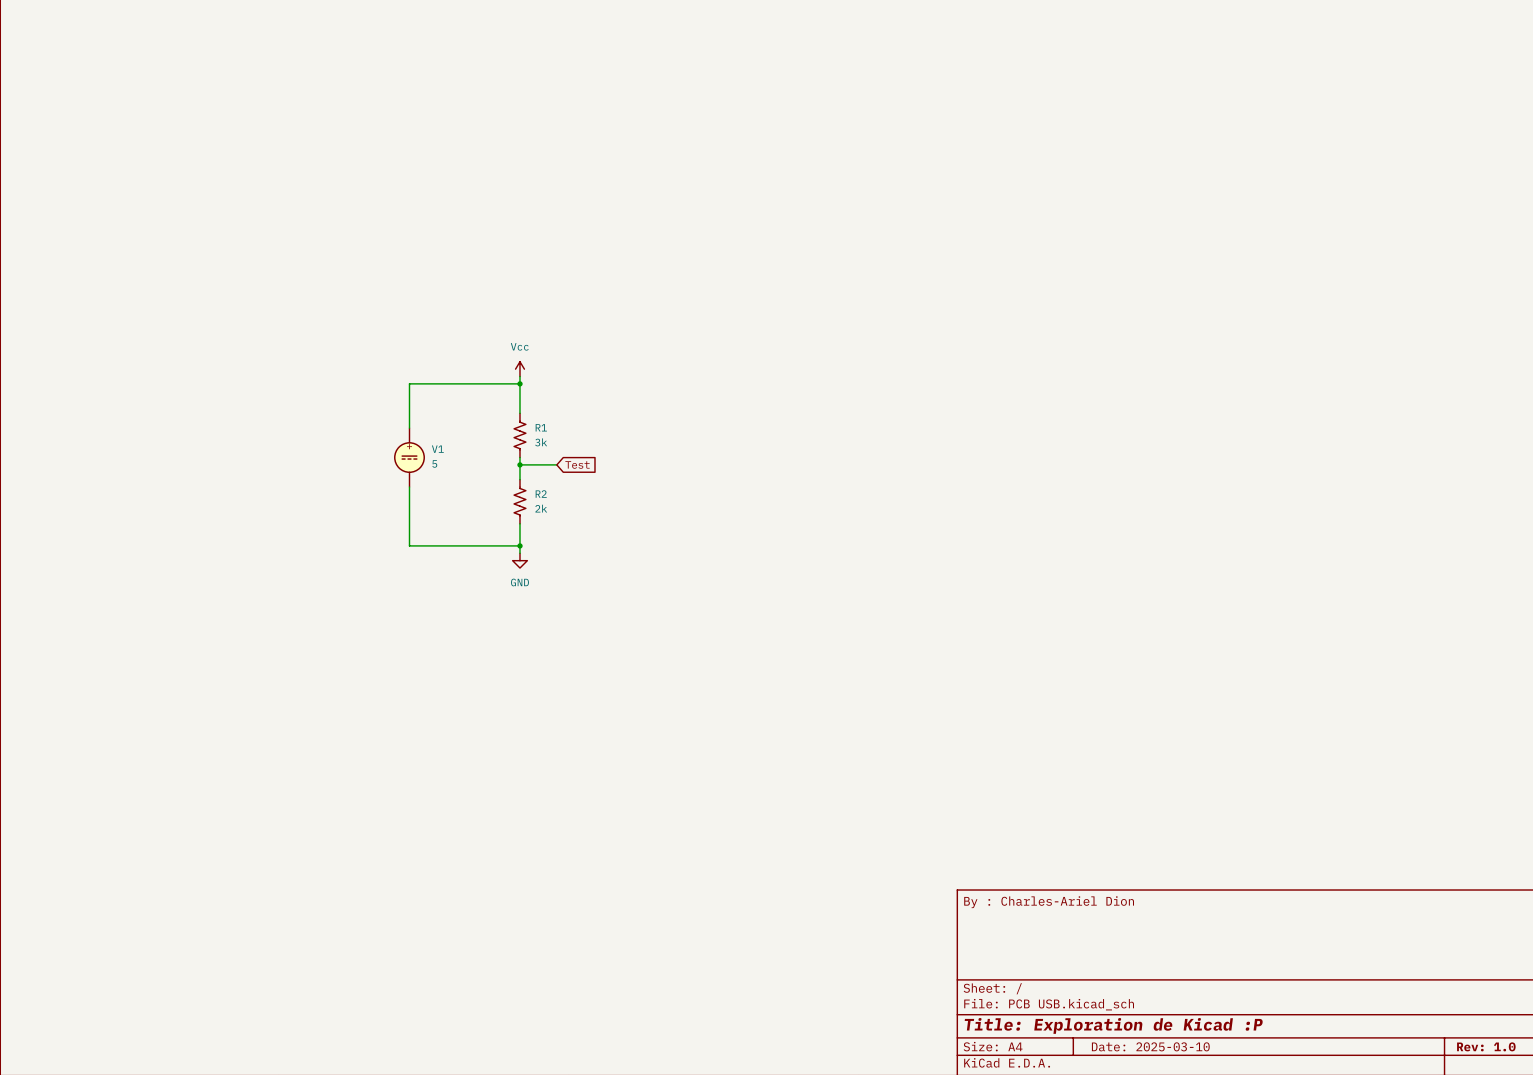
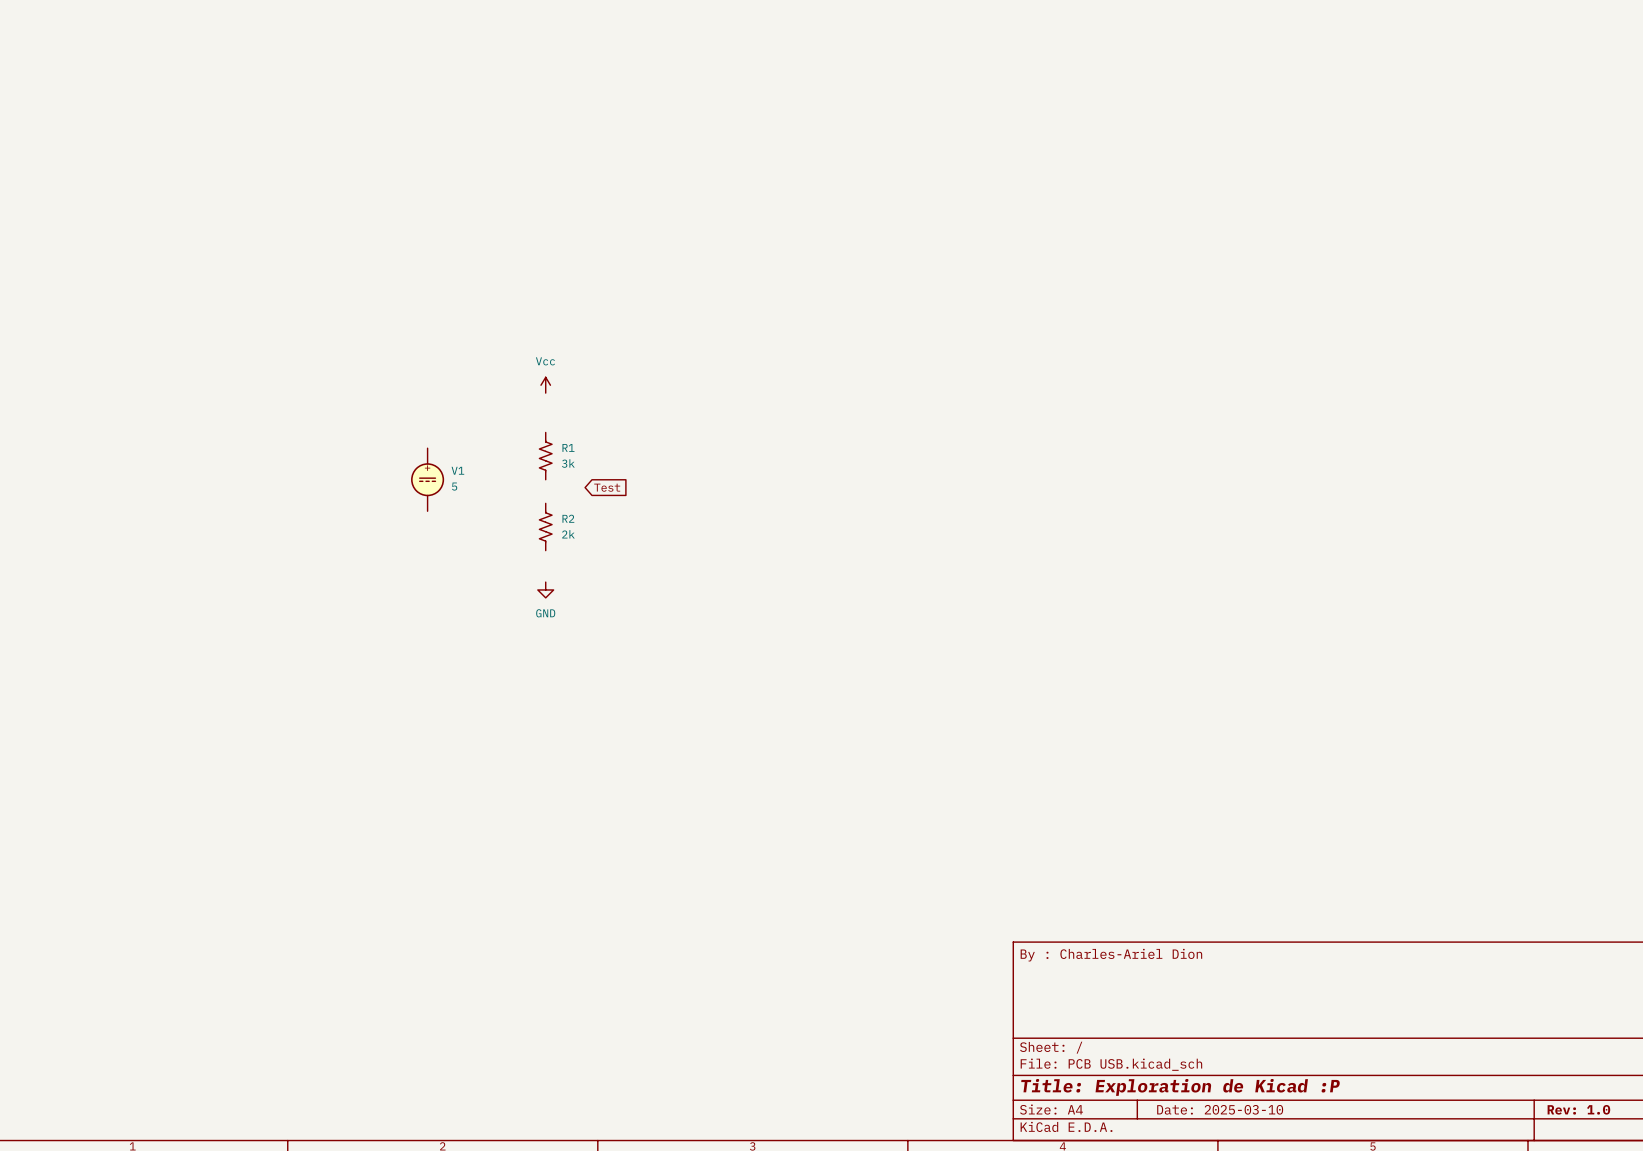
wire: (519, 376) (519, 413) -> none
wire: (519, 383) (409, 383) (409, 428) -> none
junction: (519, 383) -> none
wire: (519, 457) (519, 479) -> none
wire: (519, 464) (556, 464) -> none
junction: (519, 464) -> none
wire: (409, 487) (409, 545) (519, 545) -> none
wire: (519, 523) (519, 553) -> none
junction: (519, 545) -> none

